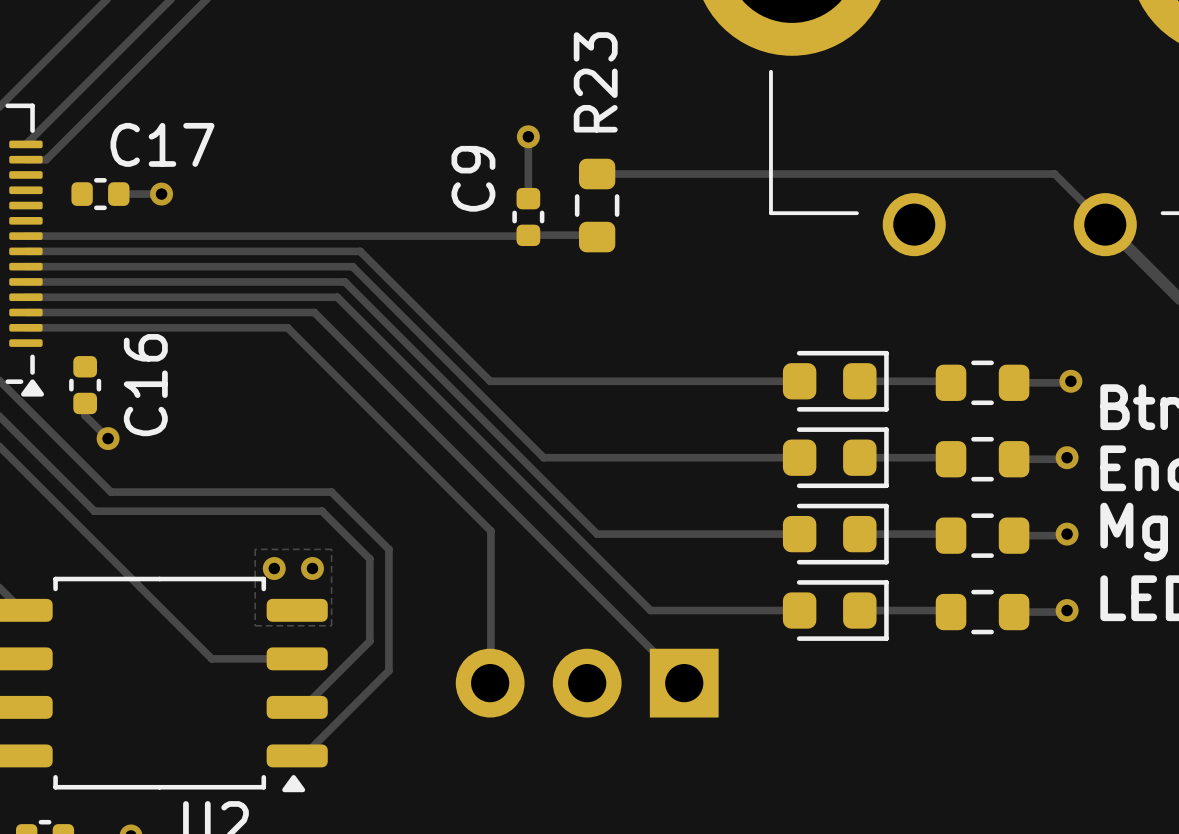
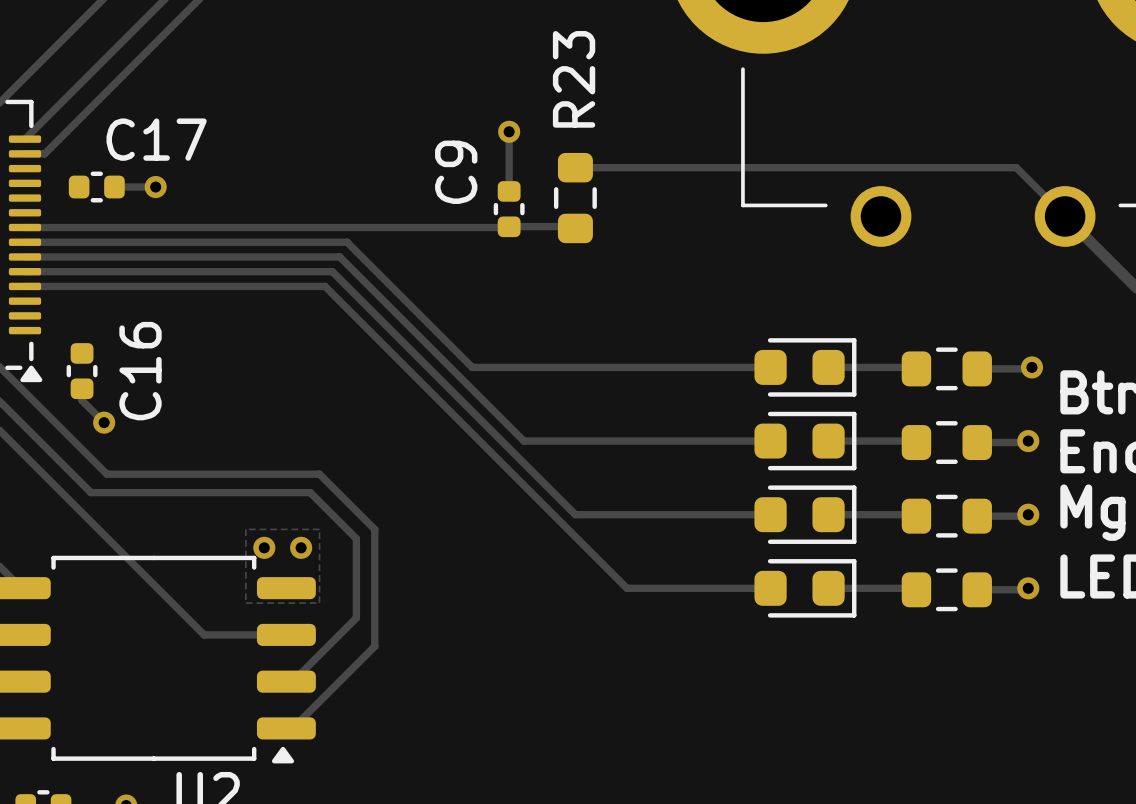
track: (25, 312) (314, 312) (685, 683) (685, 673) -> none
track: (25, 327) (287, 327) (490, 531) (490, 683) -> none
part: (587, 683) -> none

